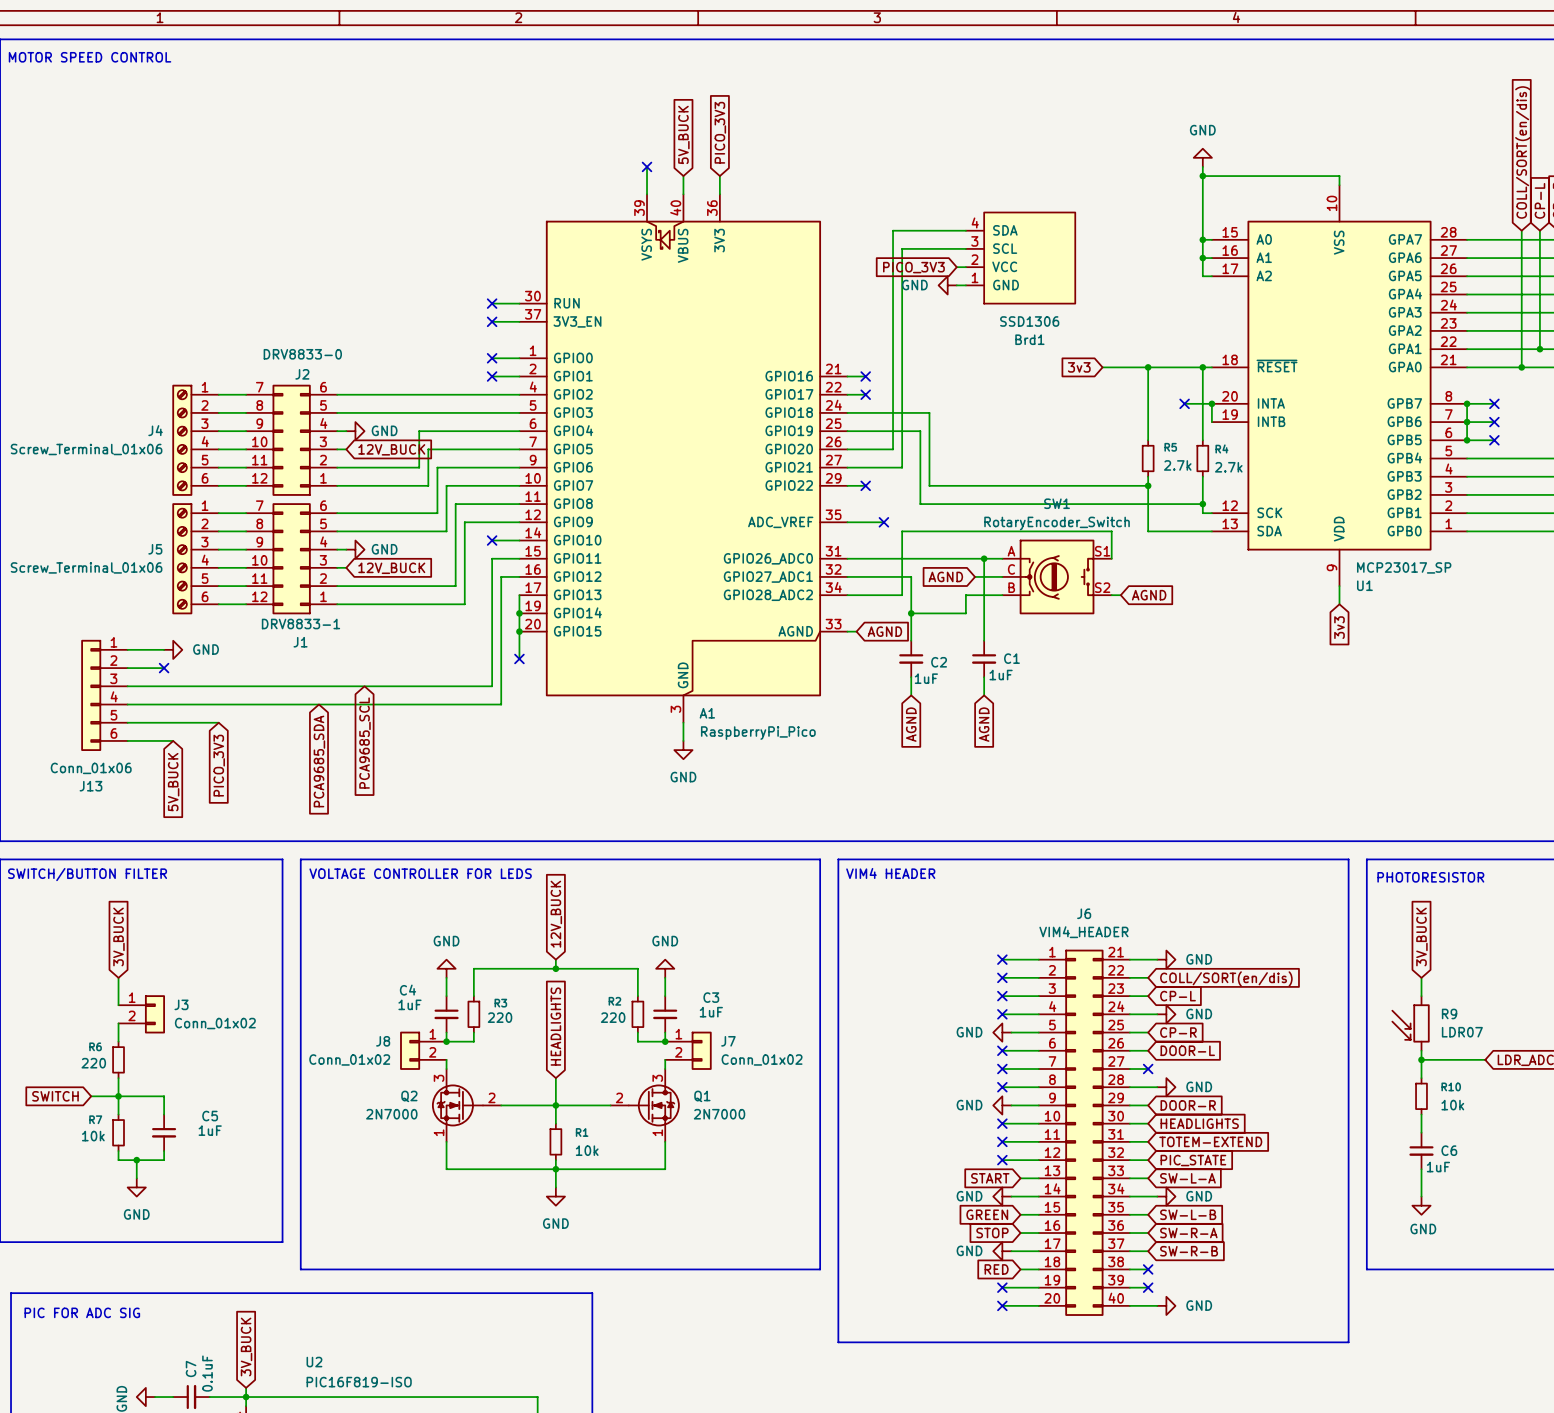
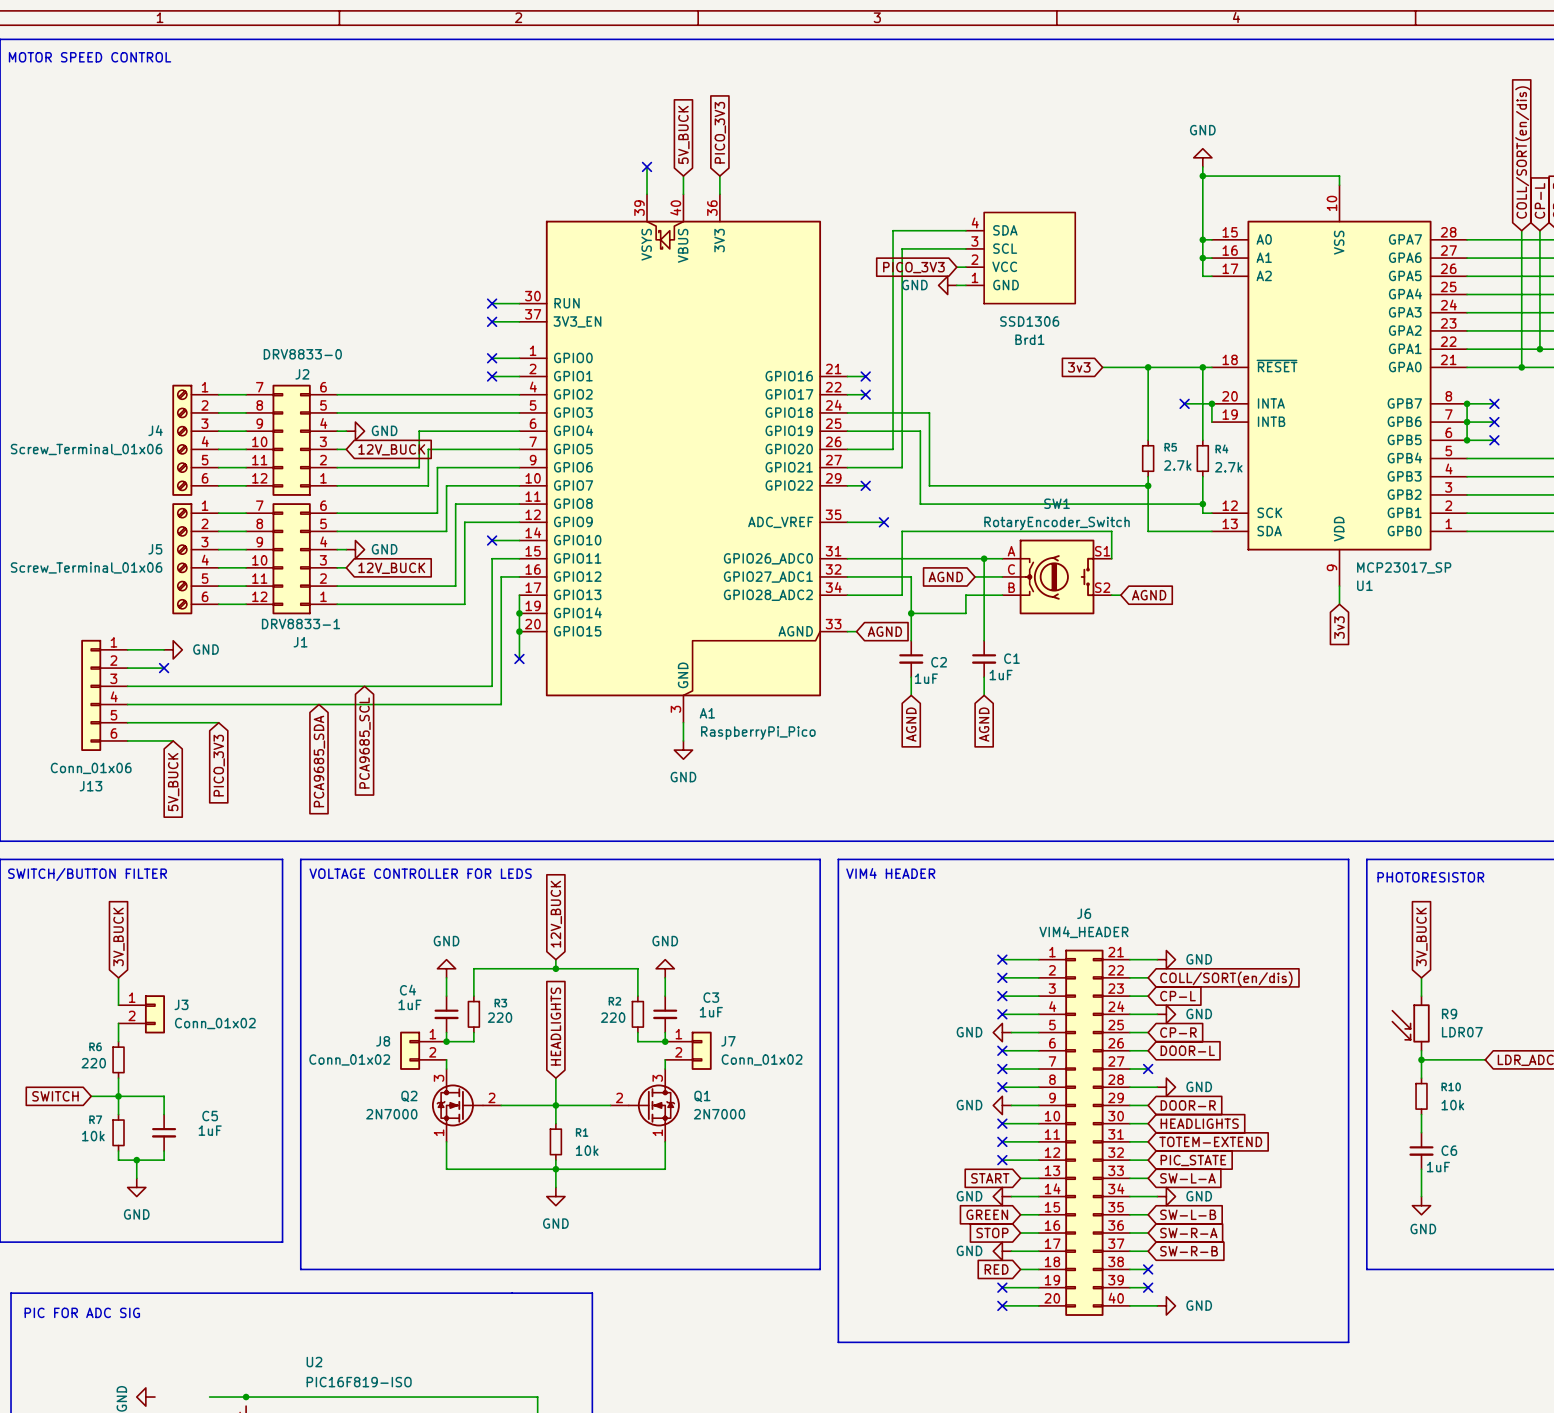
global label: 3V_BUCK (246, 1347) -> none
wire: (246, 1387) (246, 1406) -> none
wire: (154, 1397) (173, 1397) -> none
C7: 0.1uF (191, 1397) -> none

